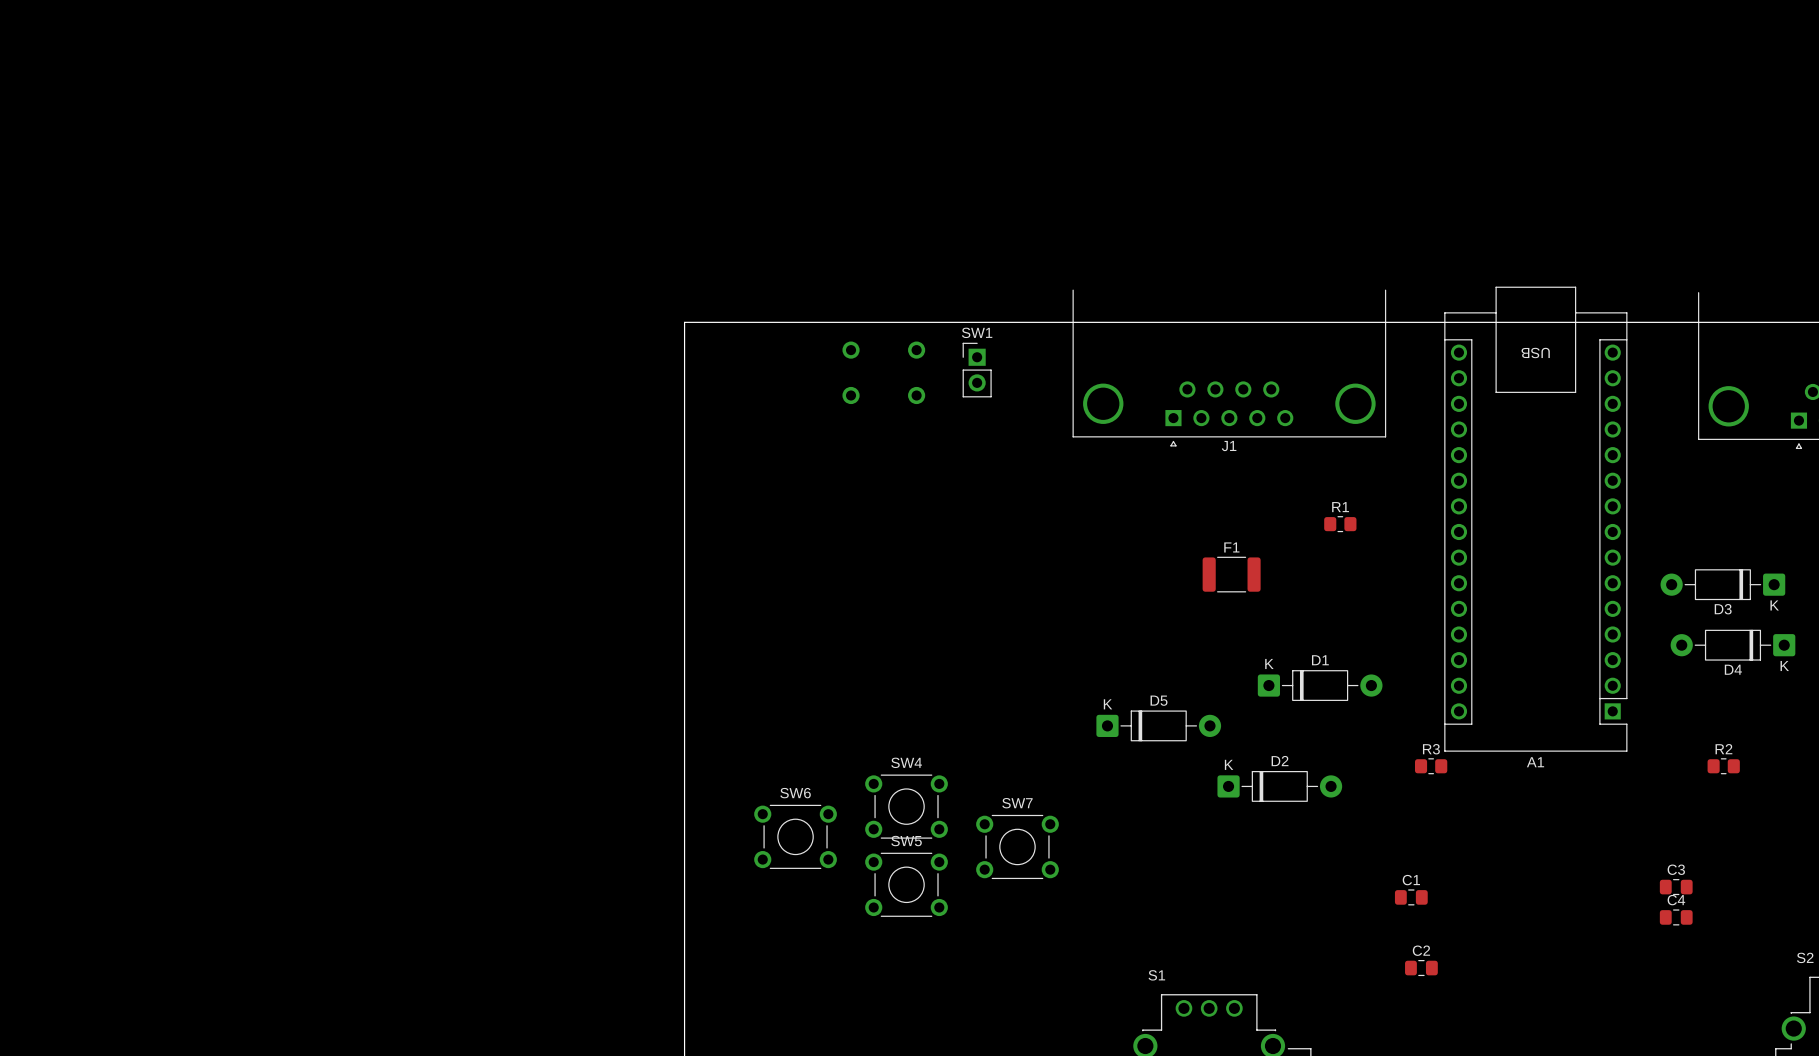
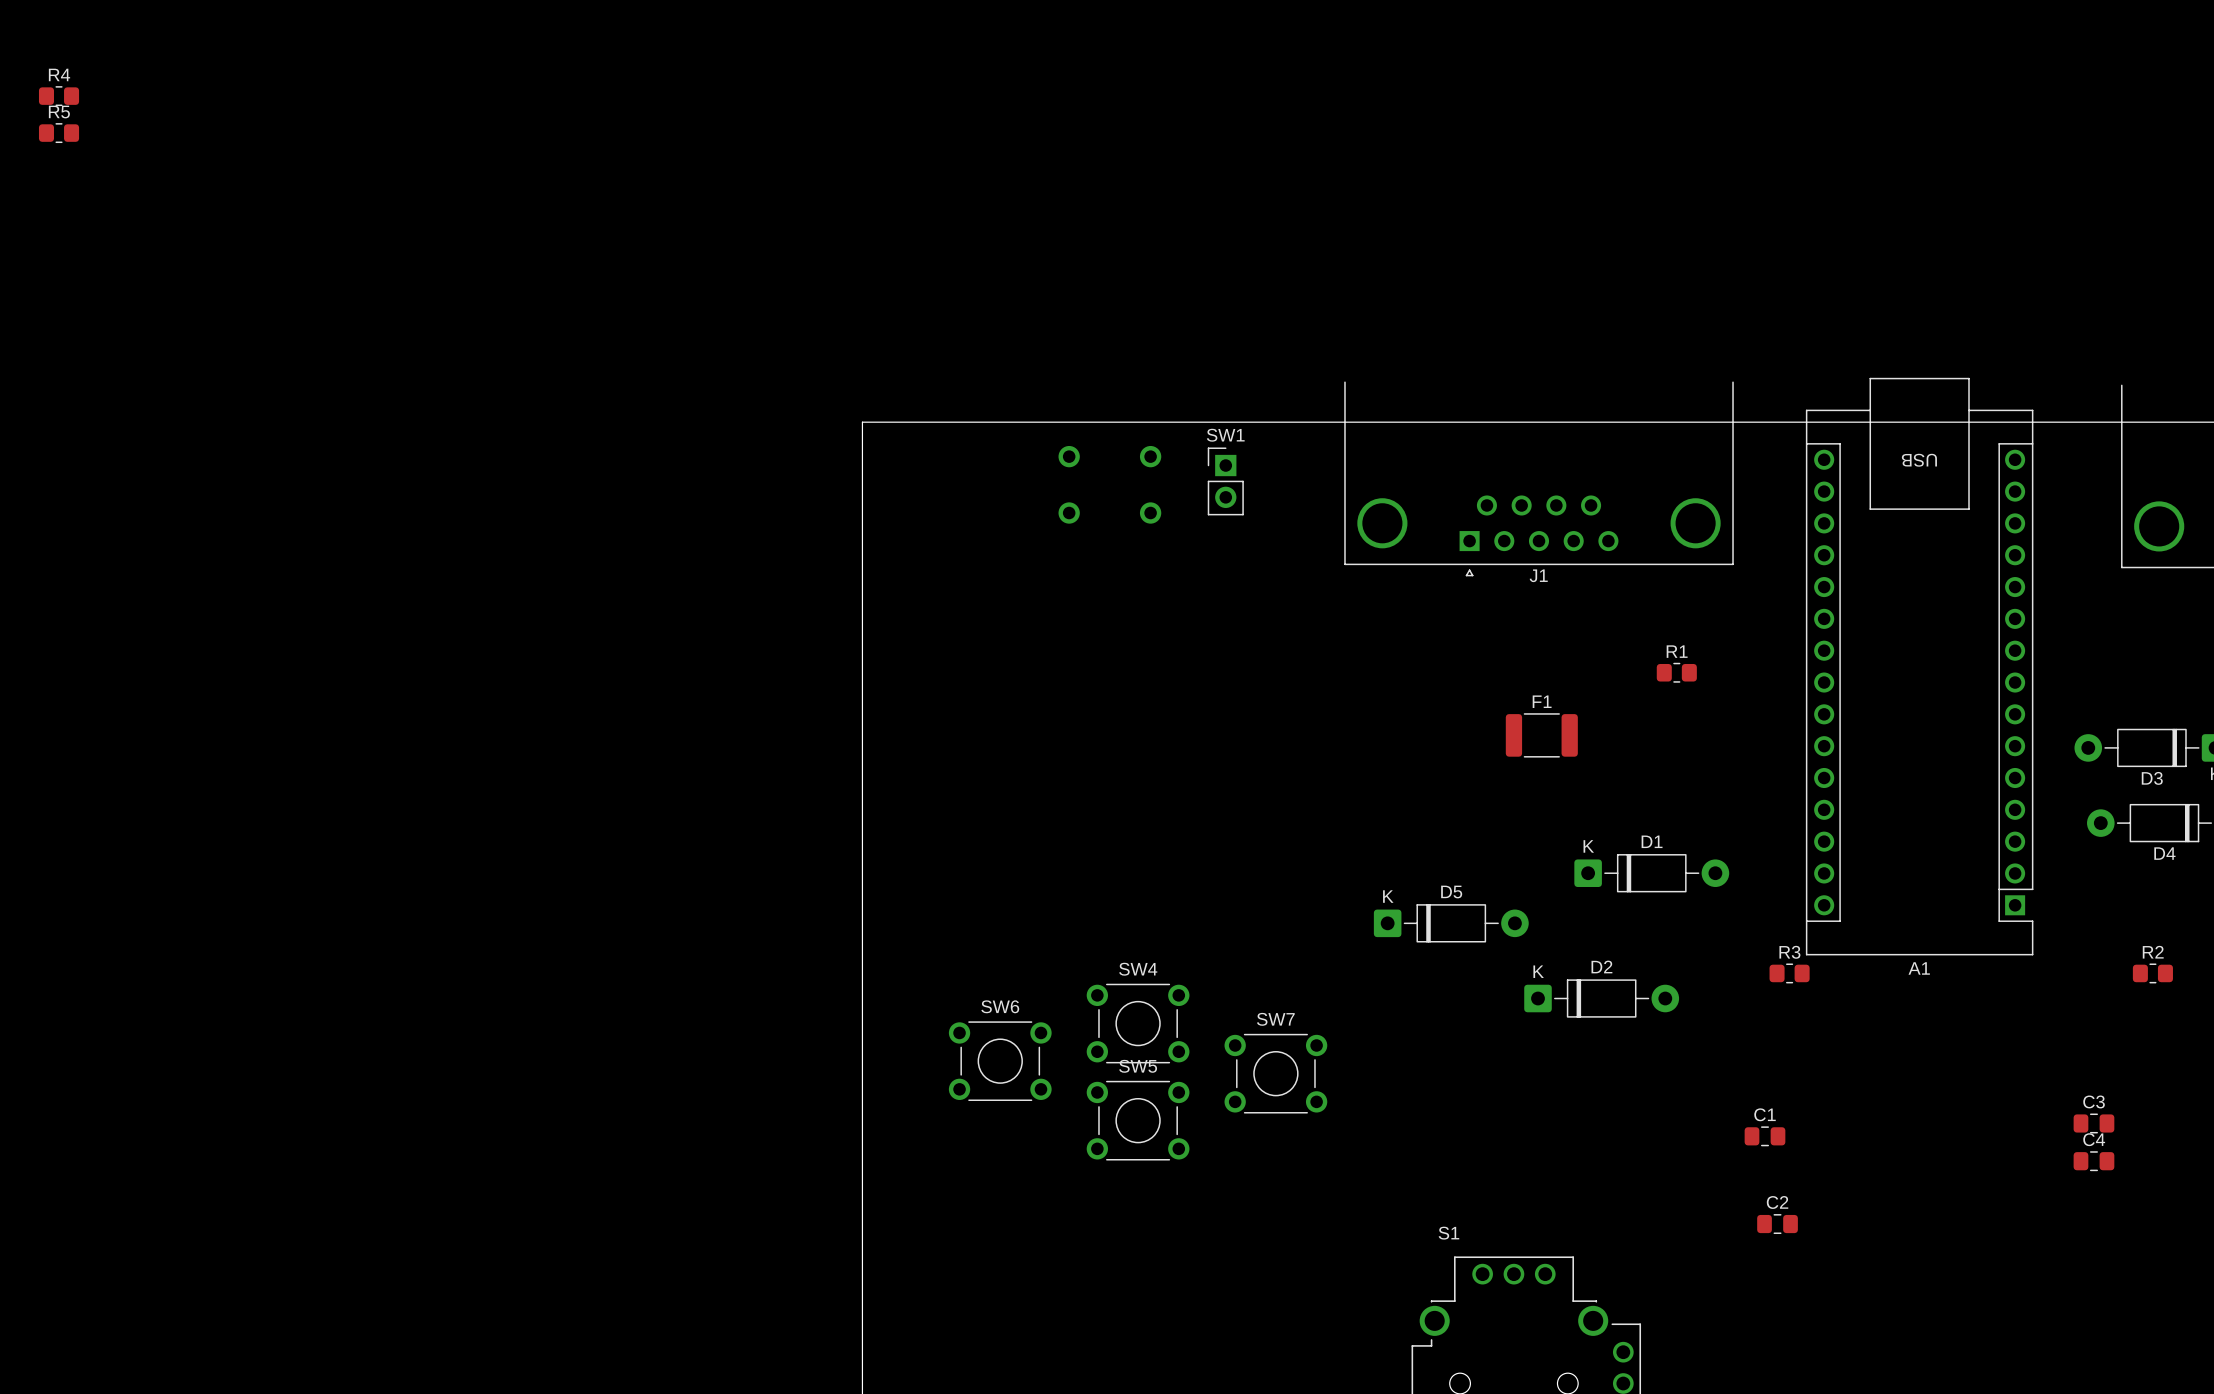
R4: none -> (59, 96)
R5: none -> (59, 133)

